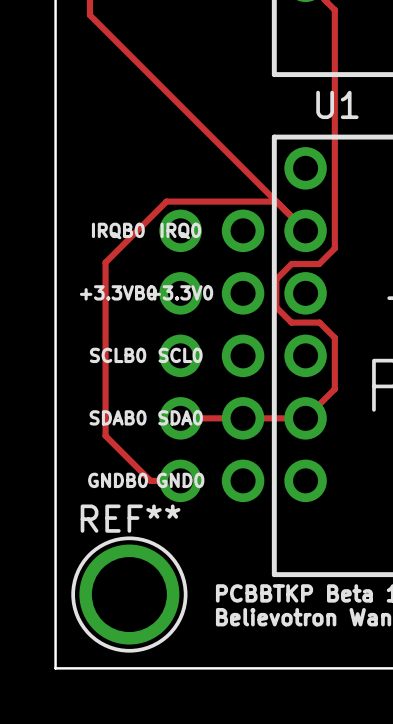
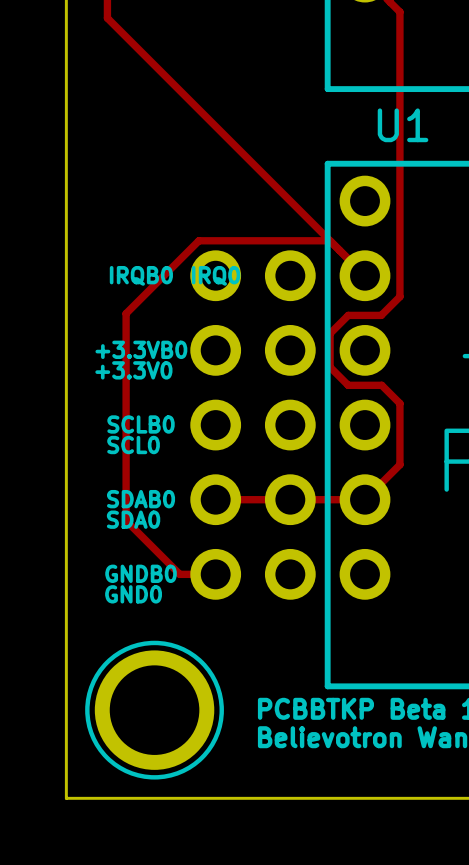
+3.3V0 name position: +3.3V0 (180, 292) -> +3.3V0 (133, 370)
SCL0 name position: SCL0 (180, 355) -> SCL0 (133, 445)
SDA0 name position: SDA0 (180, 417) -> SDA0 (133, 519)
GND0 name position: GND0 (180, 480) -> GND0 (133, 594)
REF** name: REF** (130, 518) -> none

